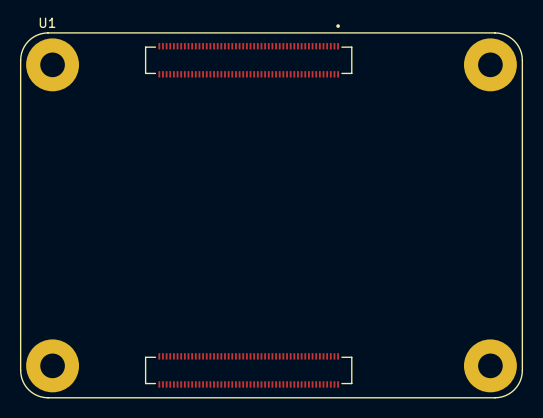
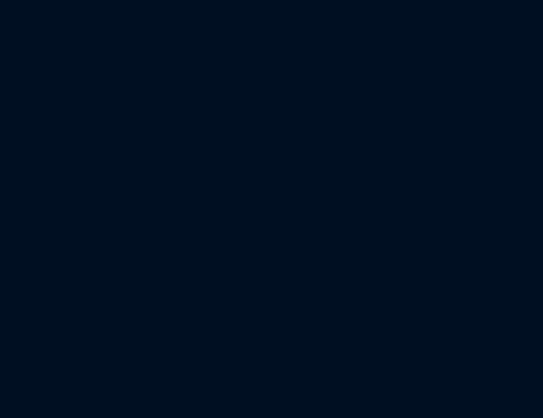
U1: (271, 211) -> none

